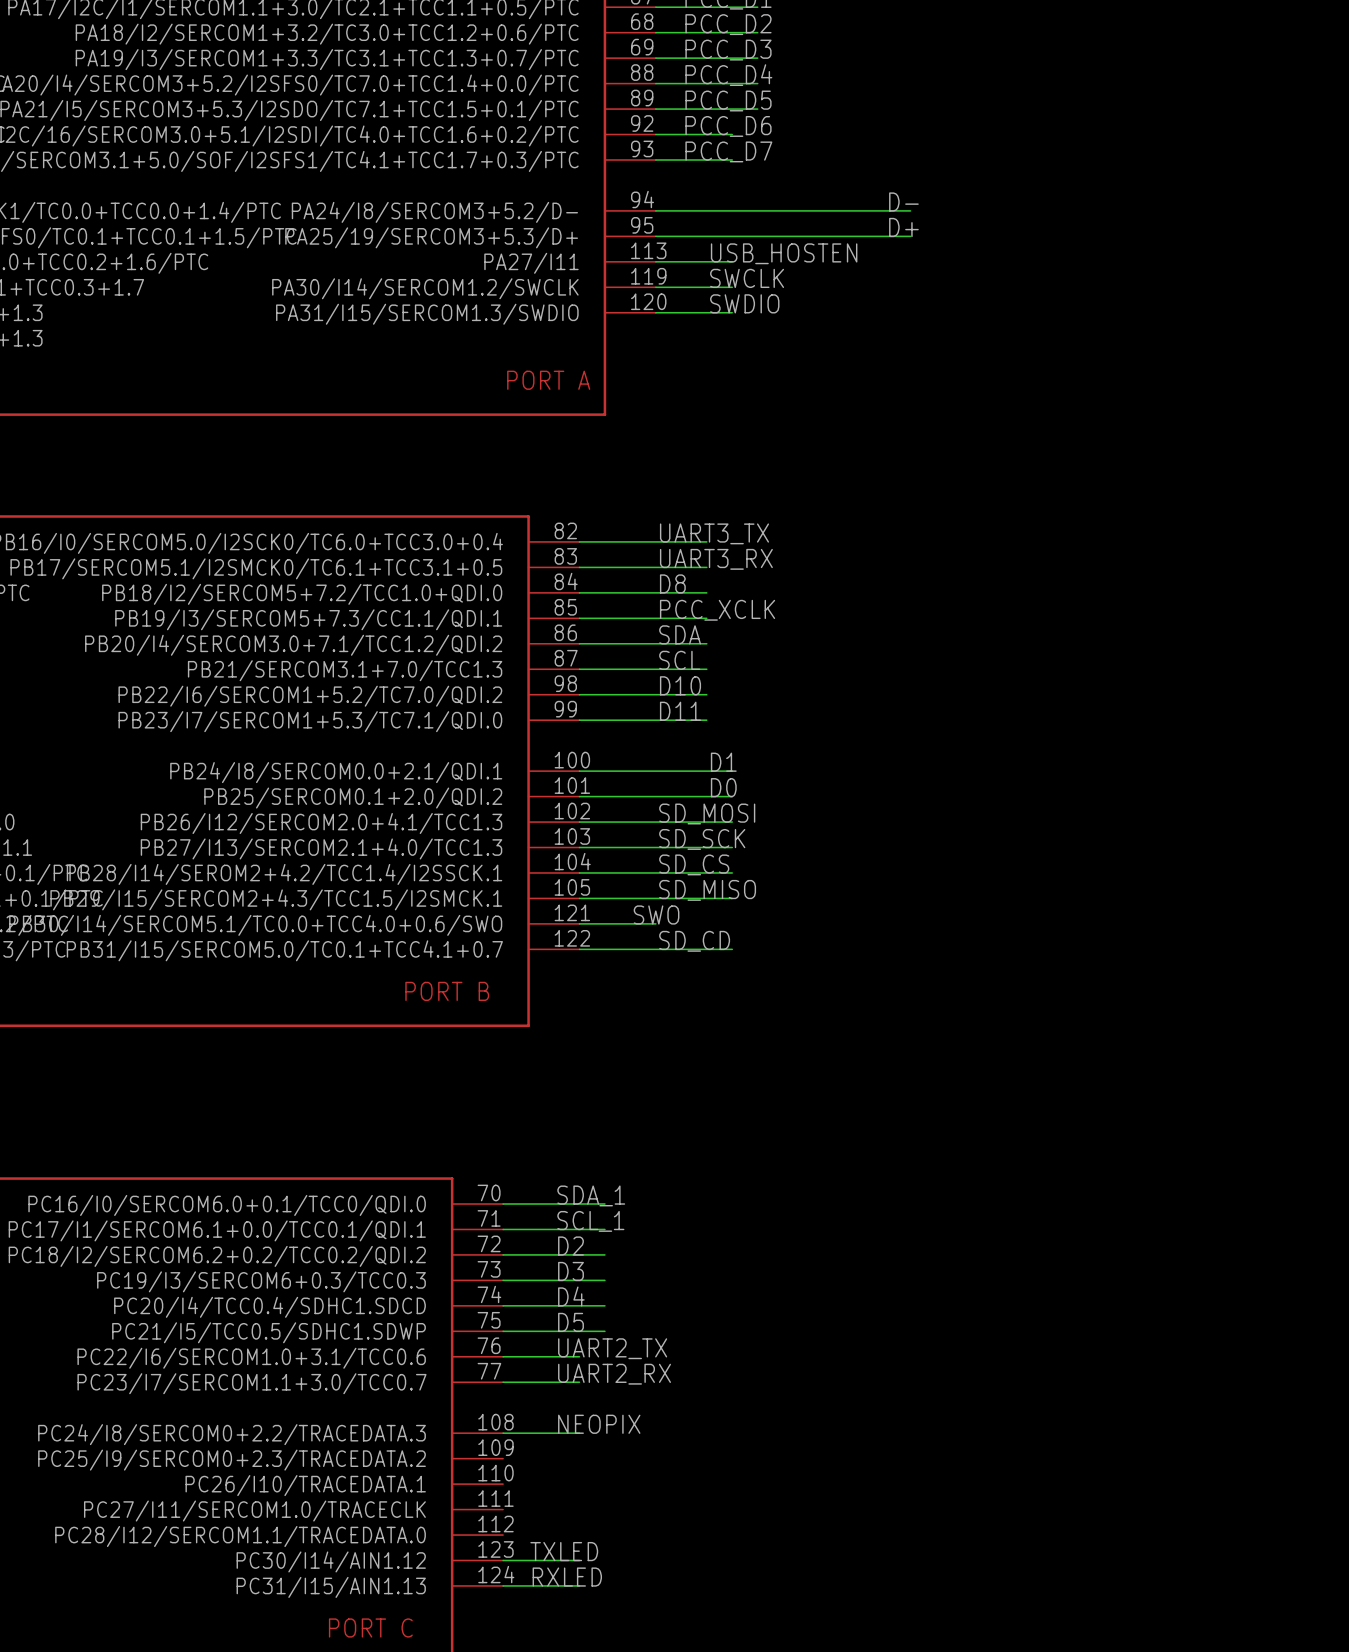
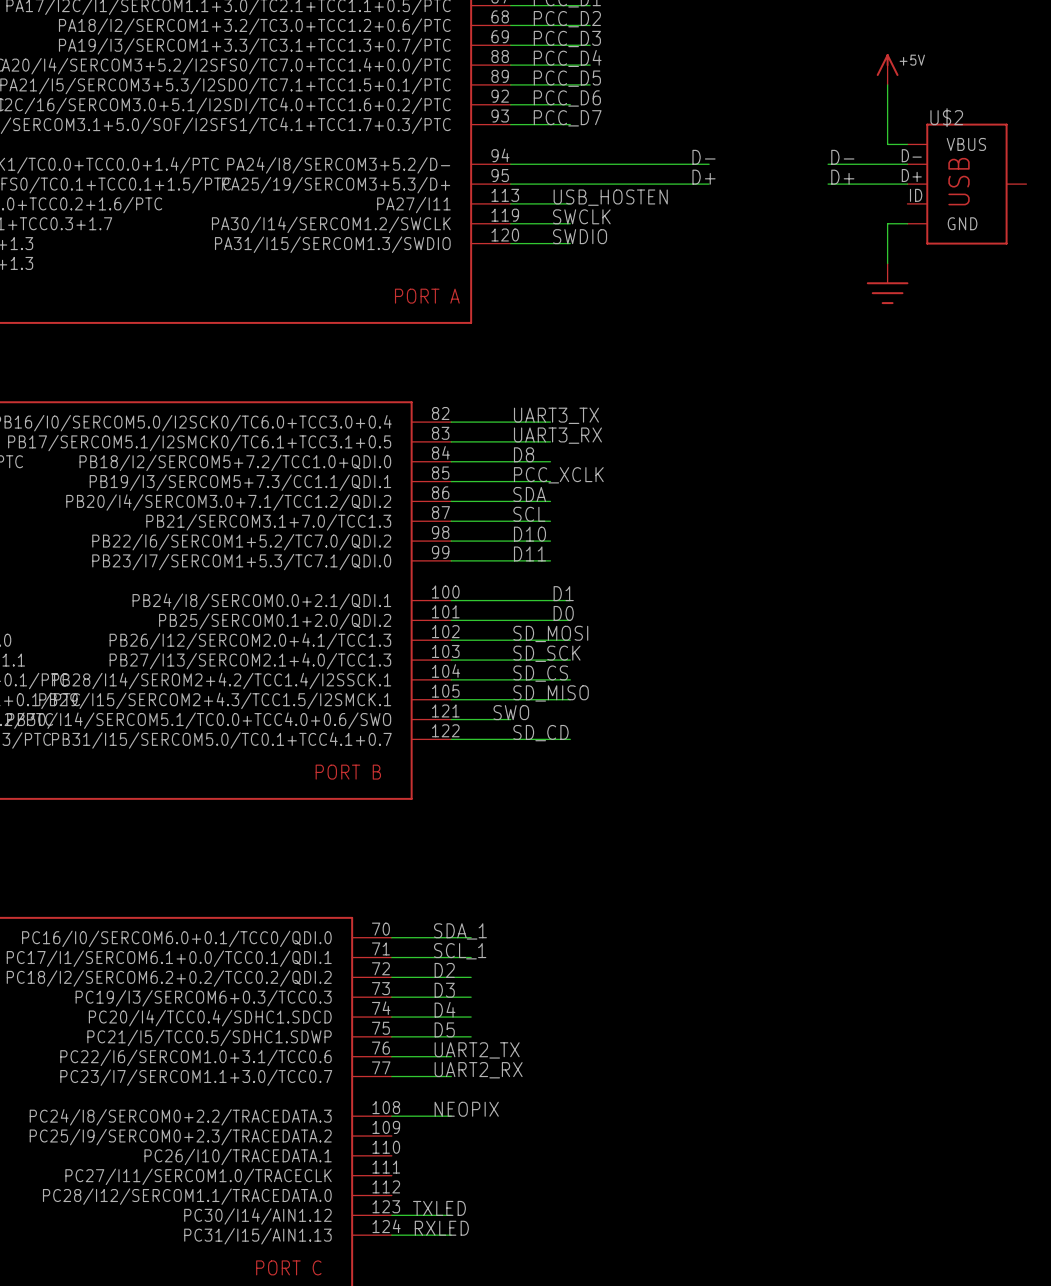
power symbol: none -> +5V (887, 69)
wire: none -> (887, 84) (887, 144) (907, 144)
label: none -> D- (842, 157)
wire: none -> (828, 164) (907, 164)
label: none -> D+ (842, 177)
wire: none -> (828, 184) (907, 184)
U$2: none -> (966, 184)
wire: none -> (907, 223) (887, 223) (887, 263)
power symbol: none -> (887, 283)

